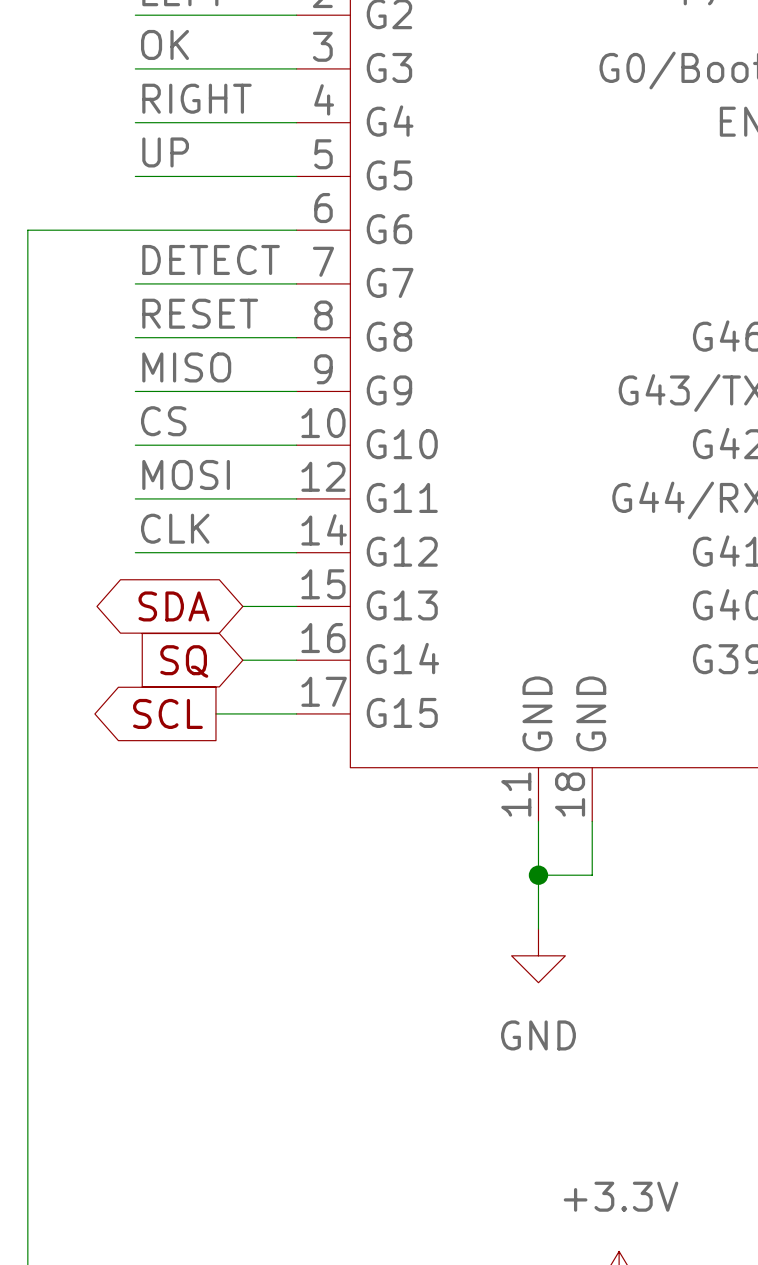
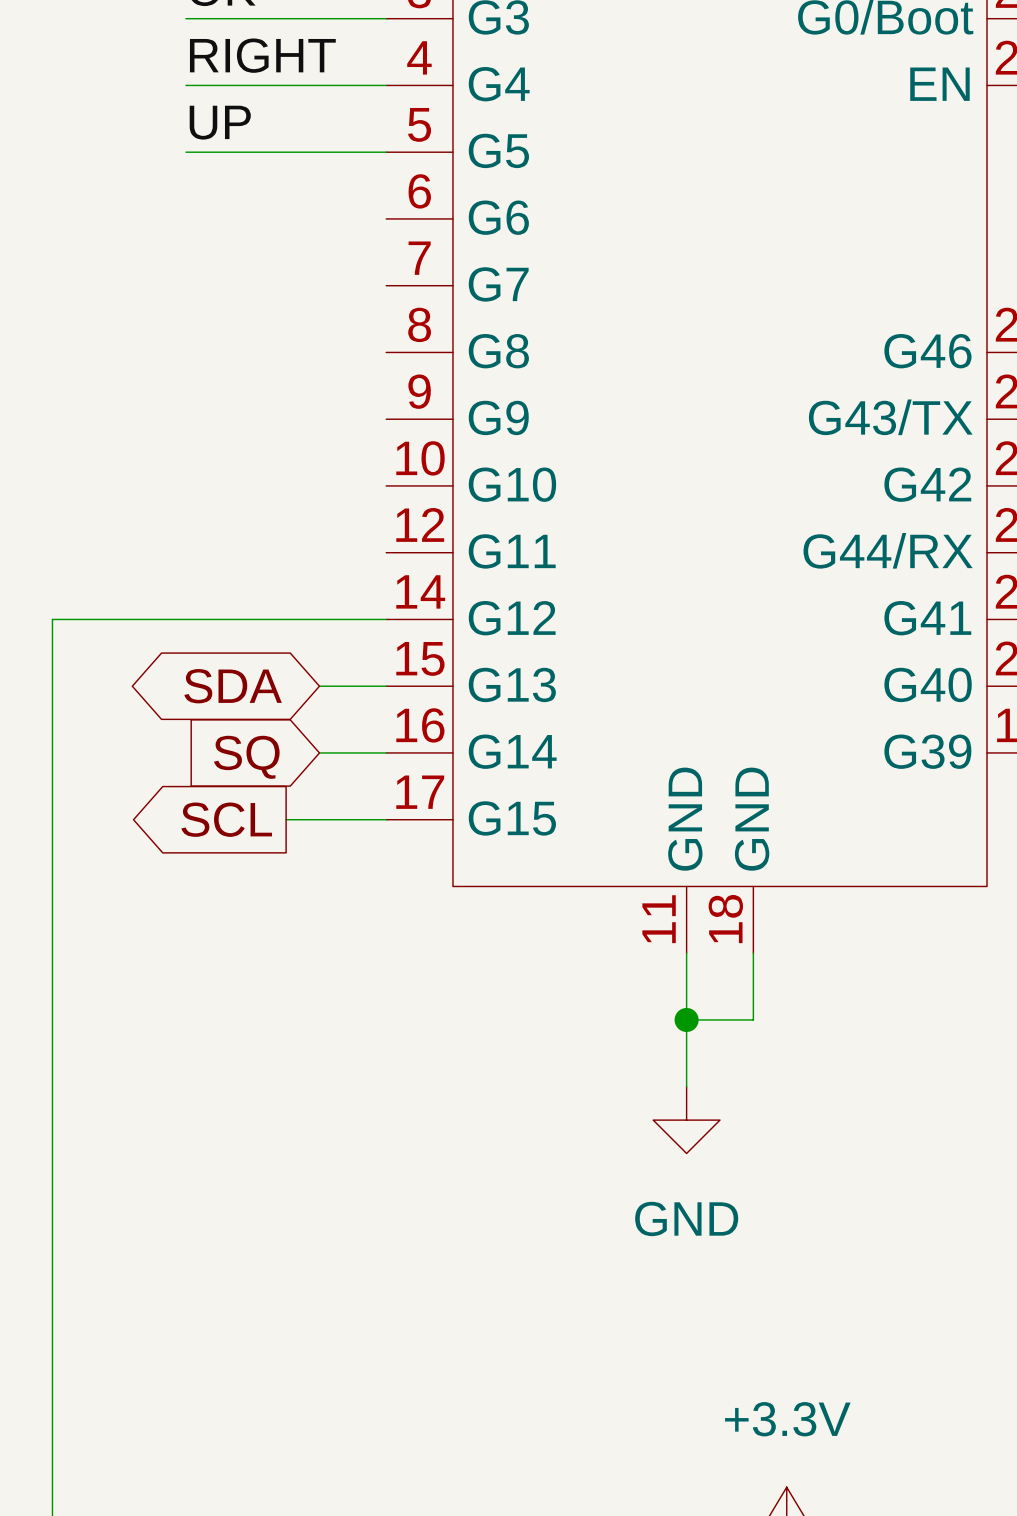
wire: (296, 230) (27, 230) (27, 552) -> (185, 619) (52, 619)
label: DETECT (211, 259) -> none
wire: (135, 283) (296, 283) -> none
label: RESET (200, 313) -> none
wire: (135, 337) (296, 337) -> none
label: MISO (186, 367) -> none
wire: (135, 391) (296, 391) -> none
label: CS (163, 421) -> none
wire: (135, 445) (296, 445) -> none
label: MOSI (186, 474) -> none
wire: (135, 498) (296, 498) -> none
label: CLK (175, 528) -> none

